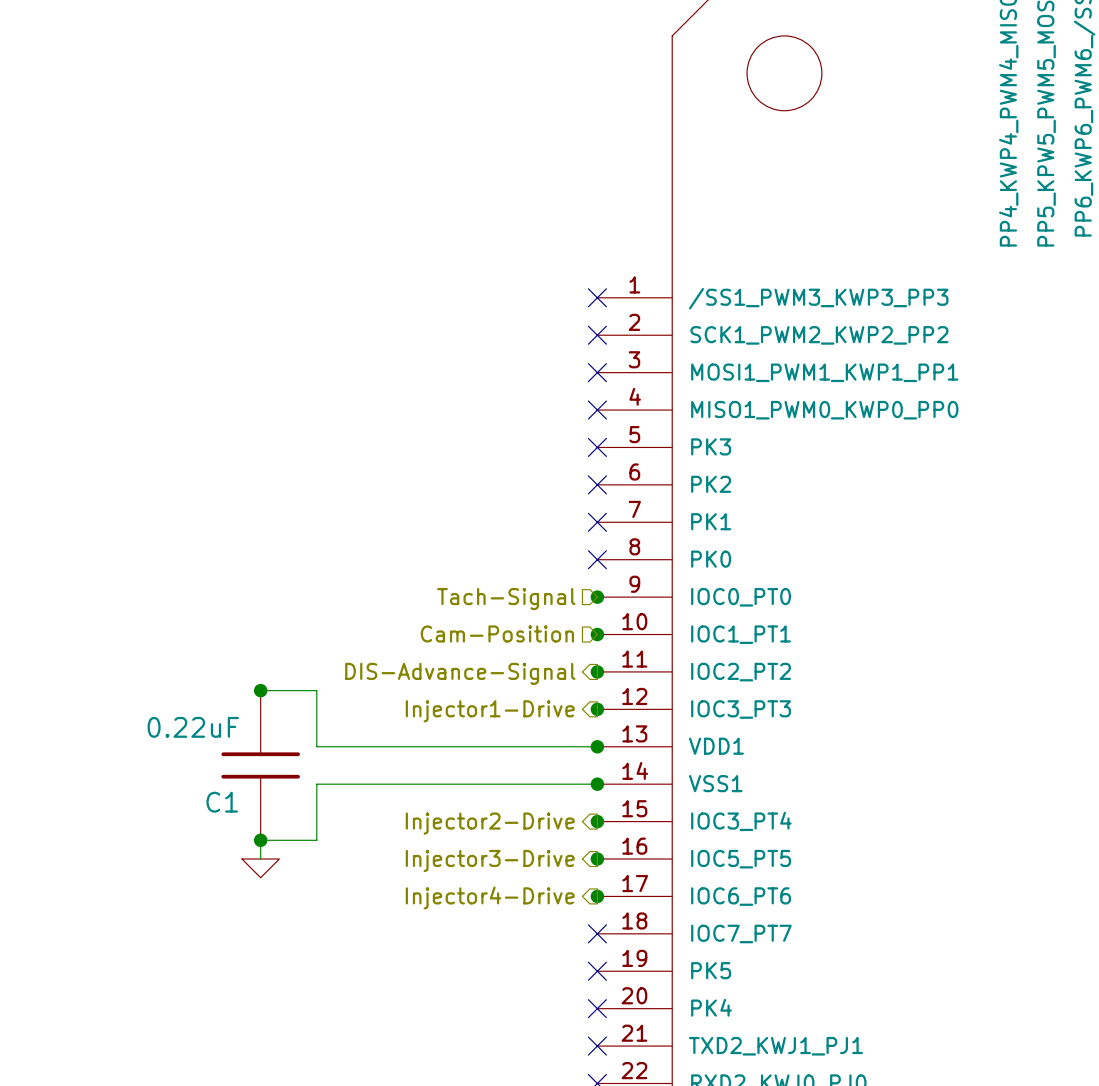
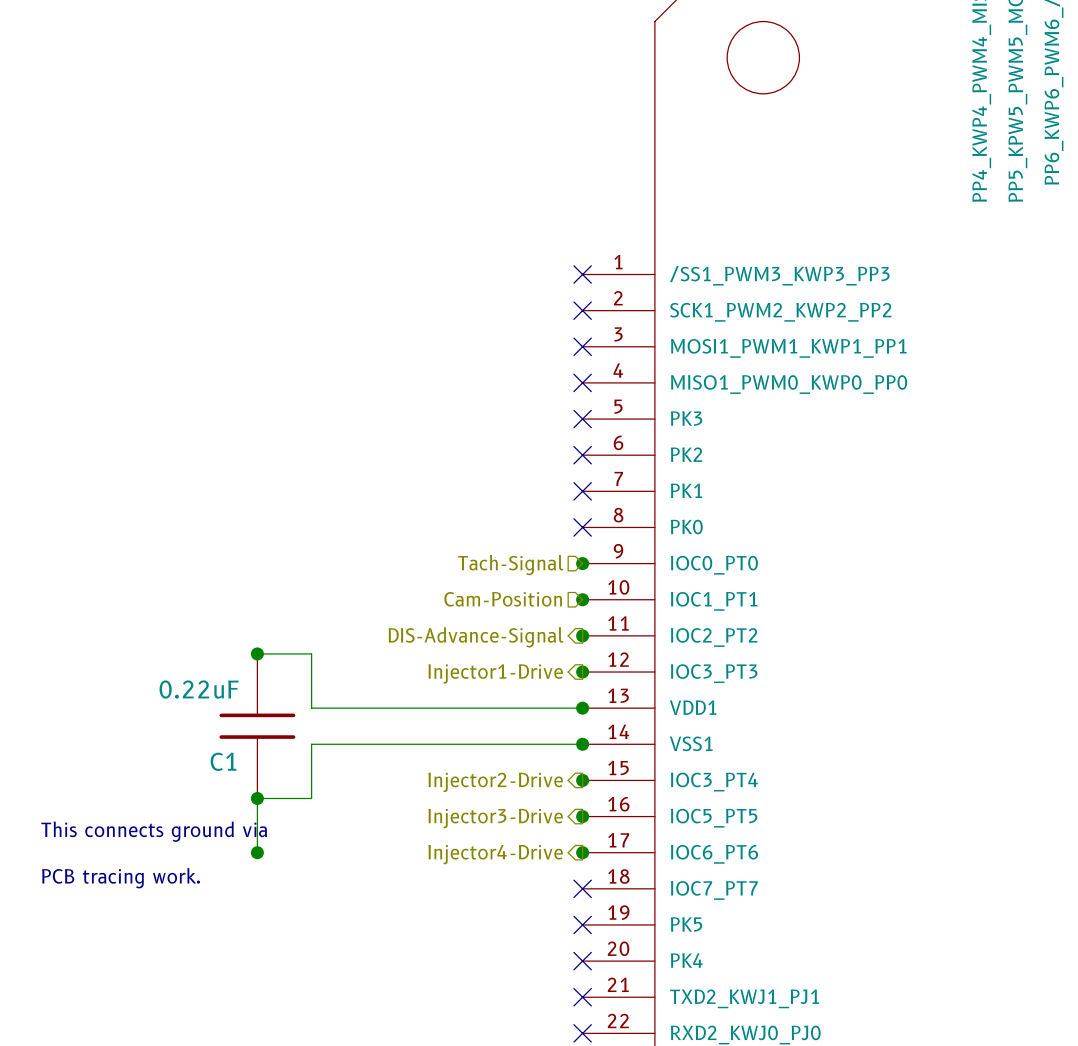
wire: none -> (257, 816) (257, 852)
power symbol: (260, 868) -> none
text: none -> This connects ground via (154, 831)
junction: none -> (257, 852)
text: none -> PCB tracing work. (121, 878)

